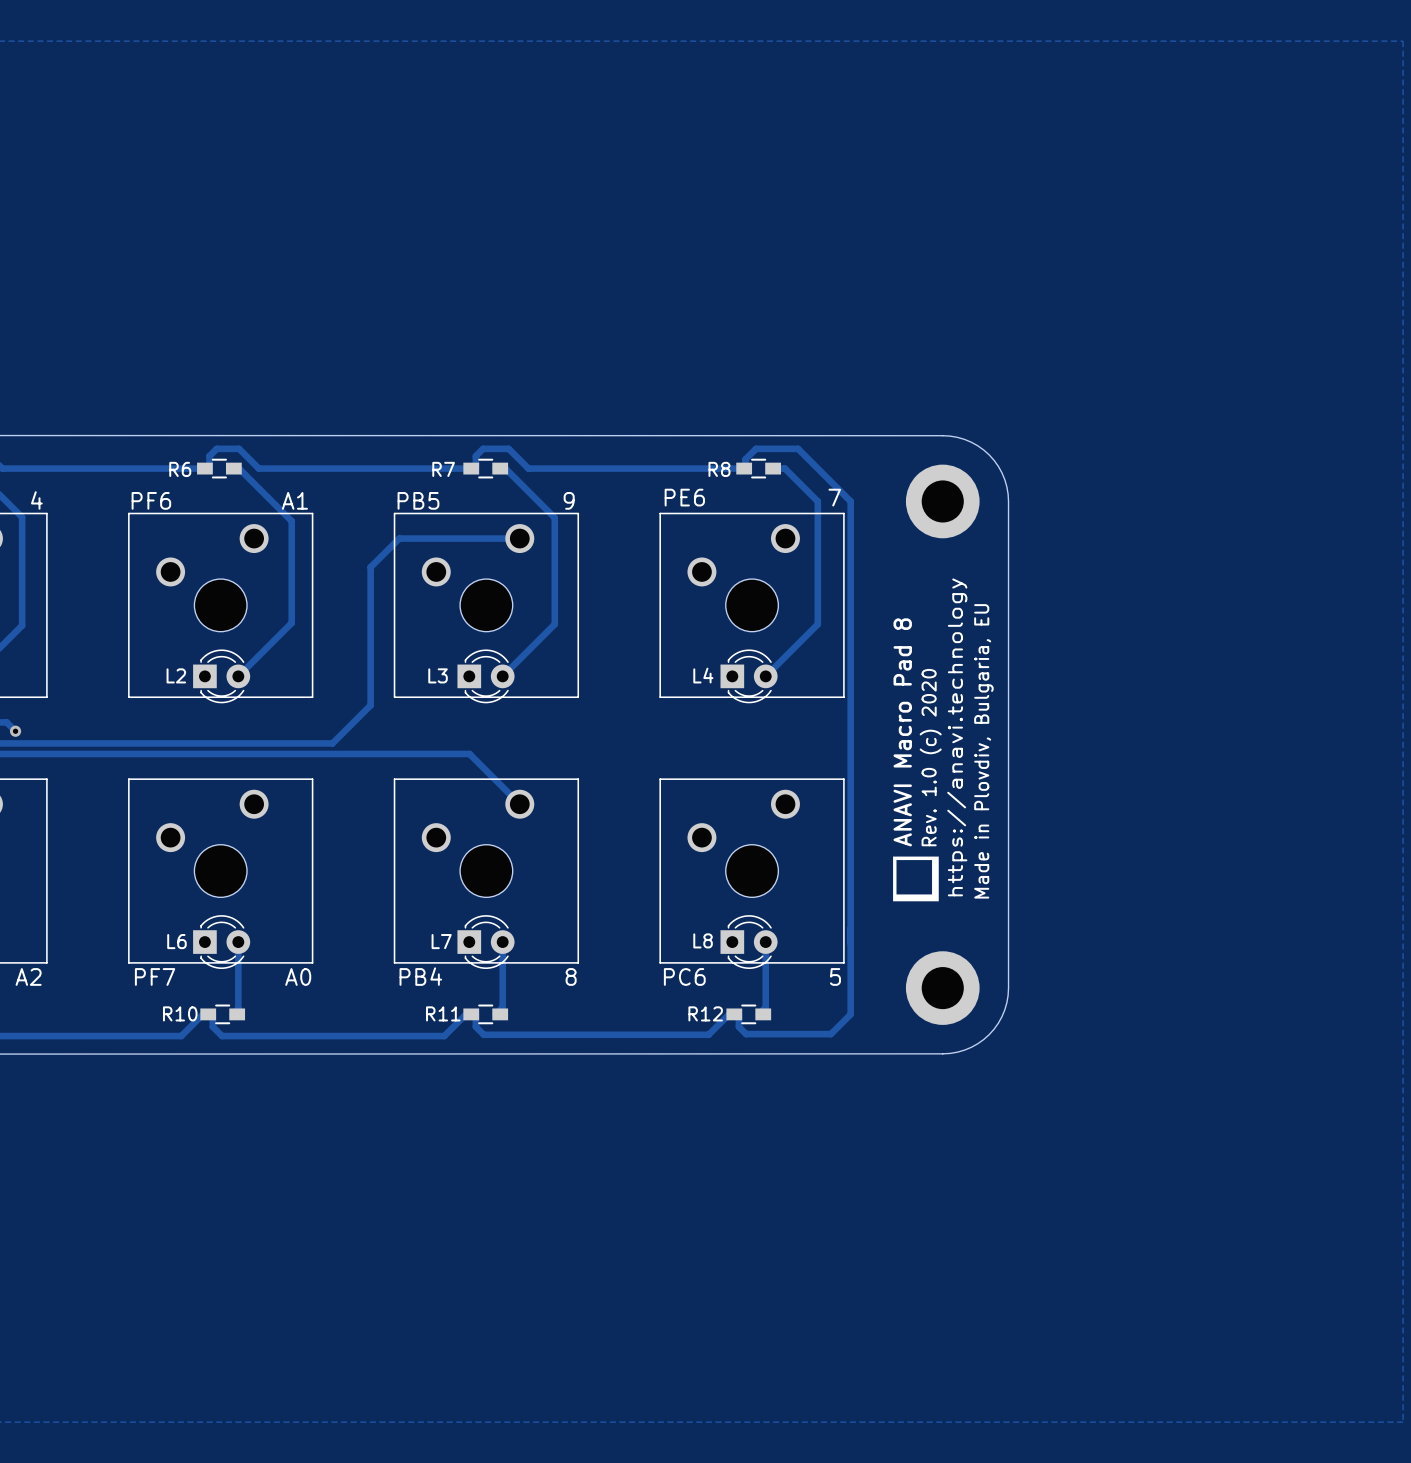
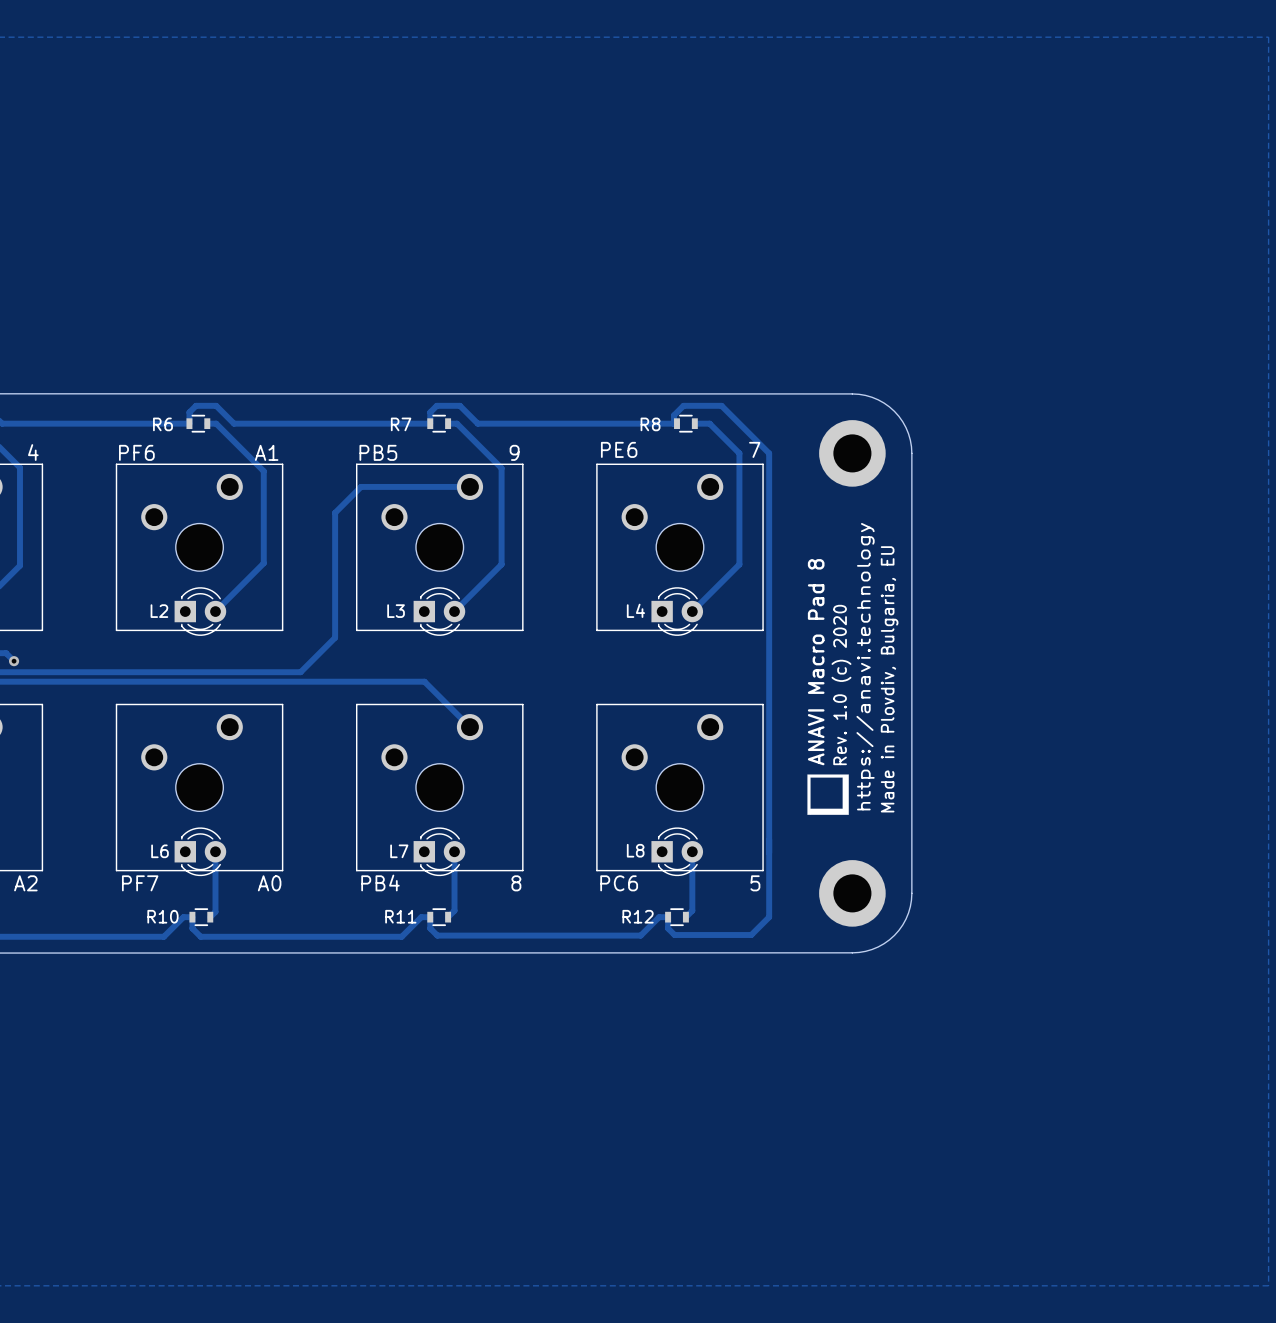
R6 footprint: [197, 458, 242, 479] -> [186, 414, 211, 433]
R7 footprint: [463, 458, 509, 479] -> [427, 414, 452, 433]
R8 footprint: [736, 458, 781, 479] -> [674, 414, 698, 433]
R10 footprint: [200, 1004, 246, 1025] -> [189, 908, 214, 927]
R11 footprint: [463, 1004, 509, 1025] -> [427, 908, 452, 927]
R12 footprint: [726, 1004, 772, 1025] -> [665, 908, 689, 927]

